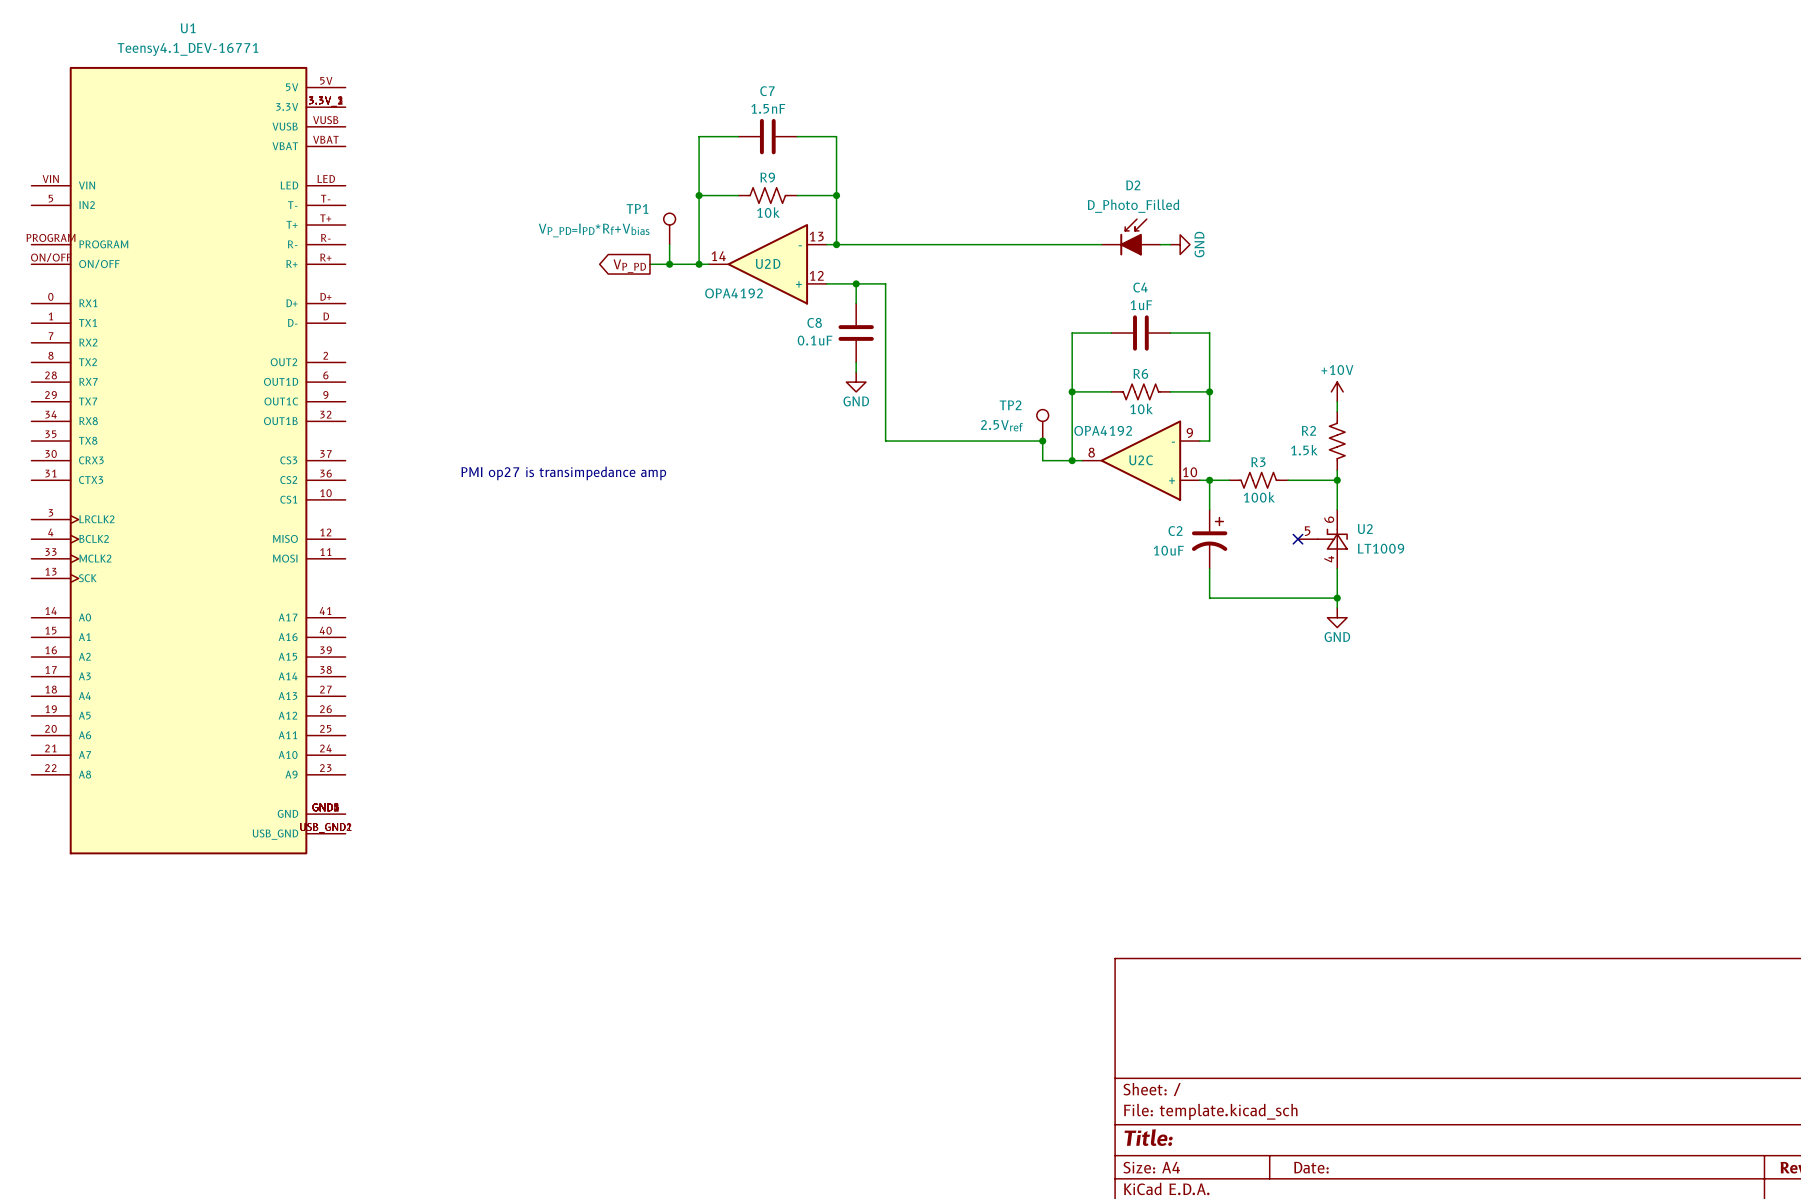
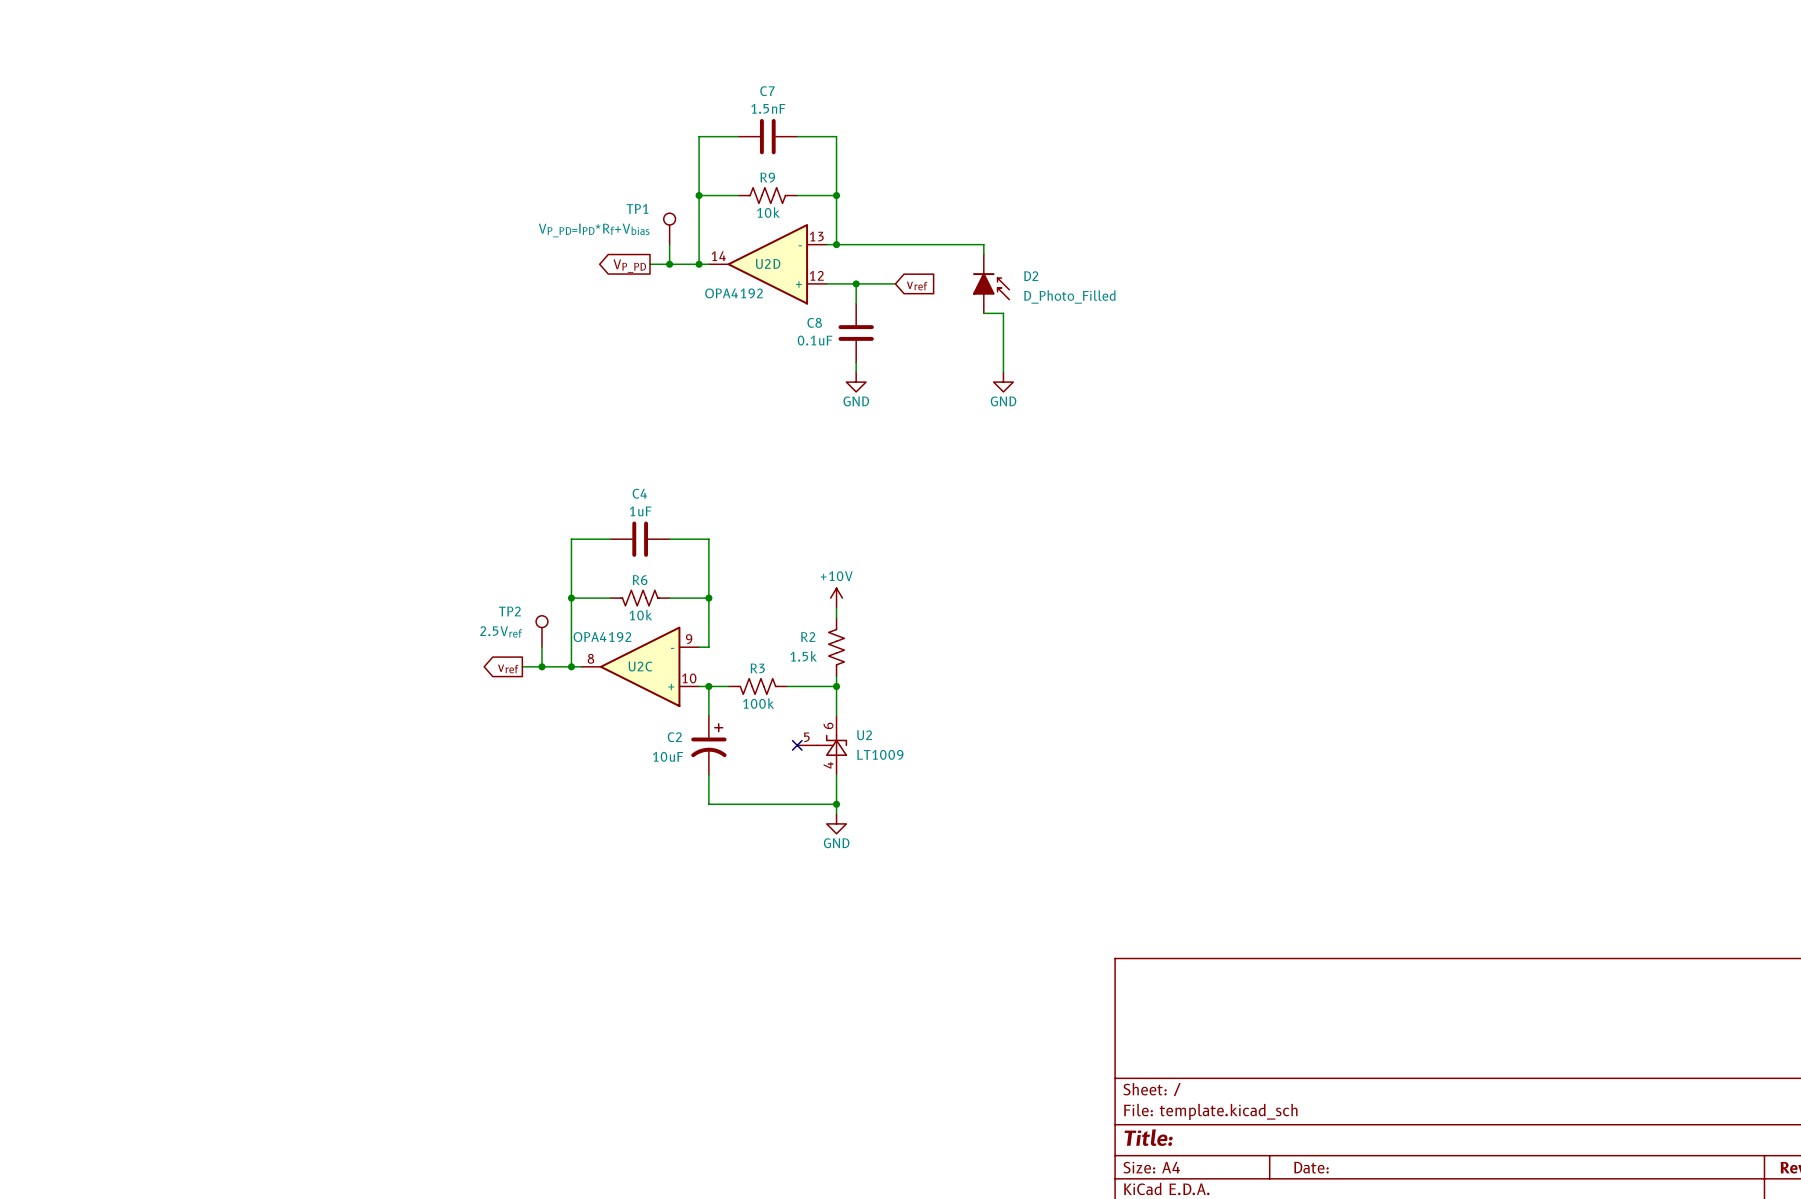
D2 value position: D_Photo_Filled (1133, 206) -> D_Photo_Filled (1069, 296)
D2 position: (1131, 237) -> (991, 283)
D2 rotation: 0° (1133, 237) -> 90° clockwise (991, 286)
wire: (983, 244) (1101, 244) -> (983, 244) (983, 254)
wire: (1160, 244) (1170, 244) -> none
power symbol: GND (1180, 244) -> none
wire: (885, 283) (885, 441) (1042, 441) (1042, 460) (1081, 460) -> (885, 283) (895, 283)
global label: none -> vref (917, 285)
wire: none -> (983, 313) (1003, 313) (1003, 372)
wire: (1111, 333) (1072, 333) (1072, 460) -> none
C4 position: (1140, 333) -> (640, 539)
wire: (1170, 333) (1209, 333) (1209, 441) (1199, 441) -> none
power symbol: none -> GND (1003, 382)
wire: (1072, 391) (1111, 391) -> none
junction: (1072, 391) -> none
R6 position: (1140, 391) -> (640, 598)
wire: (1170, 391) (1209, 391) -> none
junction: (1209, 391) -> none
power symbol: +10V (1337, 391) -> none
wire: (1337, 401) (1337, 411) -> none
TP2 position: (1042, 425) -> (541, 631)
junction: (1042, 441) -> none
R2 position: (1337, 441) -> (836, 647)
U1: Teensy4.1_DEV-16771 (188, 460) -> none
junction: (1072, 460) -> none
U2C position: (1140, 460) -> (640, 666)
wire: (1337, 470) (1337, 509) -> none
text: PMI op27 is transimpedance amp (563, 473) -> none
wire: (1199, 480) (1229, 480) -> none
wire: (1209, 480) (1209, 509) -> none
junction: (1209, 480) -> none
R3 position: (1258, 480) -> (757, 686)
wire: (1288, 480) (1337, 480) -> none
junction: (1337, 480) -> none
wire: none -> (610, 539) (571, 539) (571, 666)
wire: none -> (669, 539) (708, 539) (708, 647) (699, 647)
C2 position: (1209, 539) -> (708, 745)
no-connect mark: (1297, 539) -> none
U2 position: (1322, 539) -> (822, 745)
wire: (1209, 568) (1209, 598) (1337, 598) -> none
wire: (1337, 568) (1337, 607) -> none
wire: none -> (571, 598) (610, 598)
junction: none -> (571, 598)
wire: none -> (669, 598) (708, 598)
junction: none -> (708, 598)
power symbol: none -> +10V (836, 598)
junction: (1337, 598) -> none
wire: none -> (836, 607) (836, 617)
power symbol: GND (1337, 617) -> none
wire: none -> (541, 647) (541, 666)
wire: none -> (522, 666) (581, 666)
junction: none -> (541, 666)
junction: none -> (571, 666)
global label: none -> vref (508, 668)
wire: none -> (836, 676) (836, 715)
wire: none -> (699, 686) (728, 686)
wire: none -> (708, 686) (708, 715)
junction: none -> (708, 686)
wire: none -> (787, 686) (836, 686)
junction: none -> (836, 686)
no-connect mark: none -> (797, 745)
wire: none -> (708, 774) (708, 804) (836, 804)
wire: none -> (836, 774) (836, 814)
junction: none -> (836, 804)
power symbol: none -> GND (836, 823)

